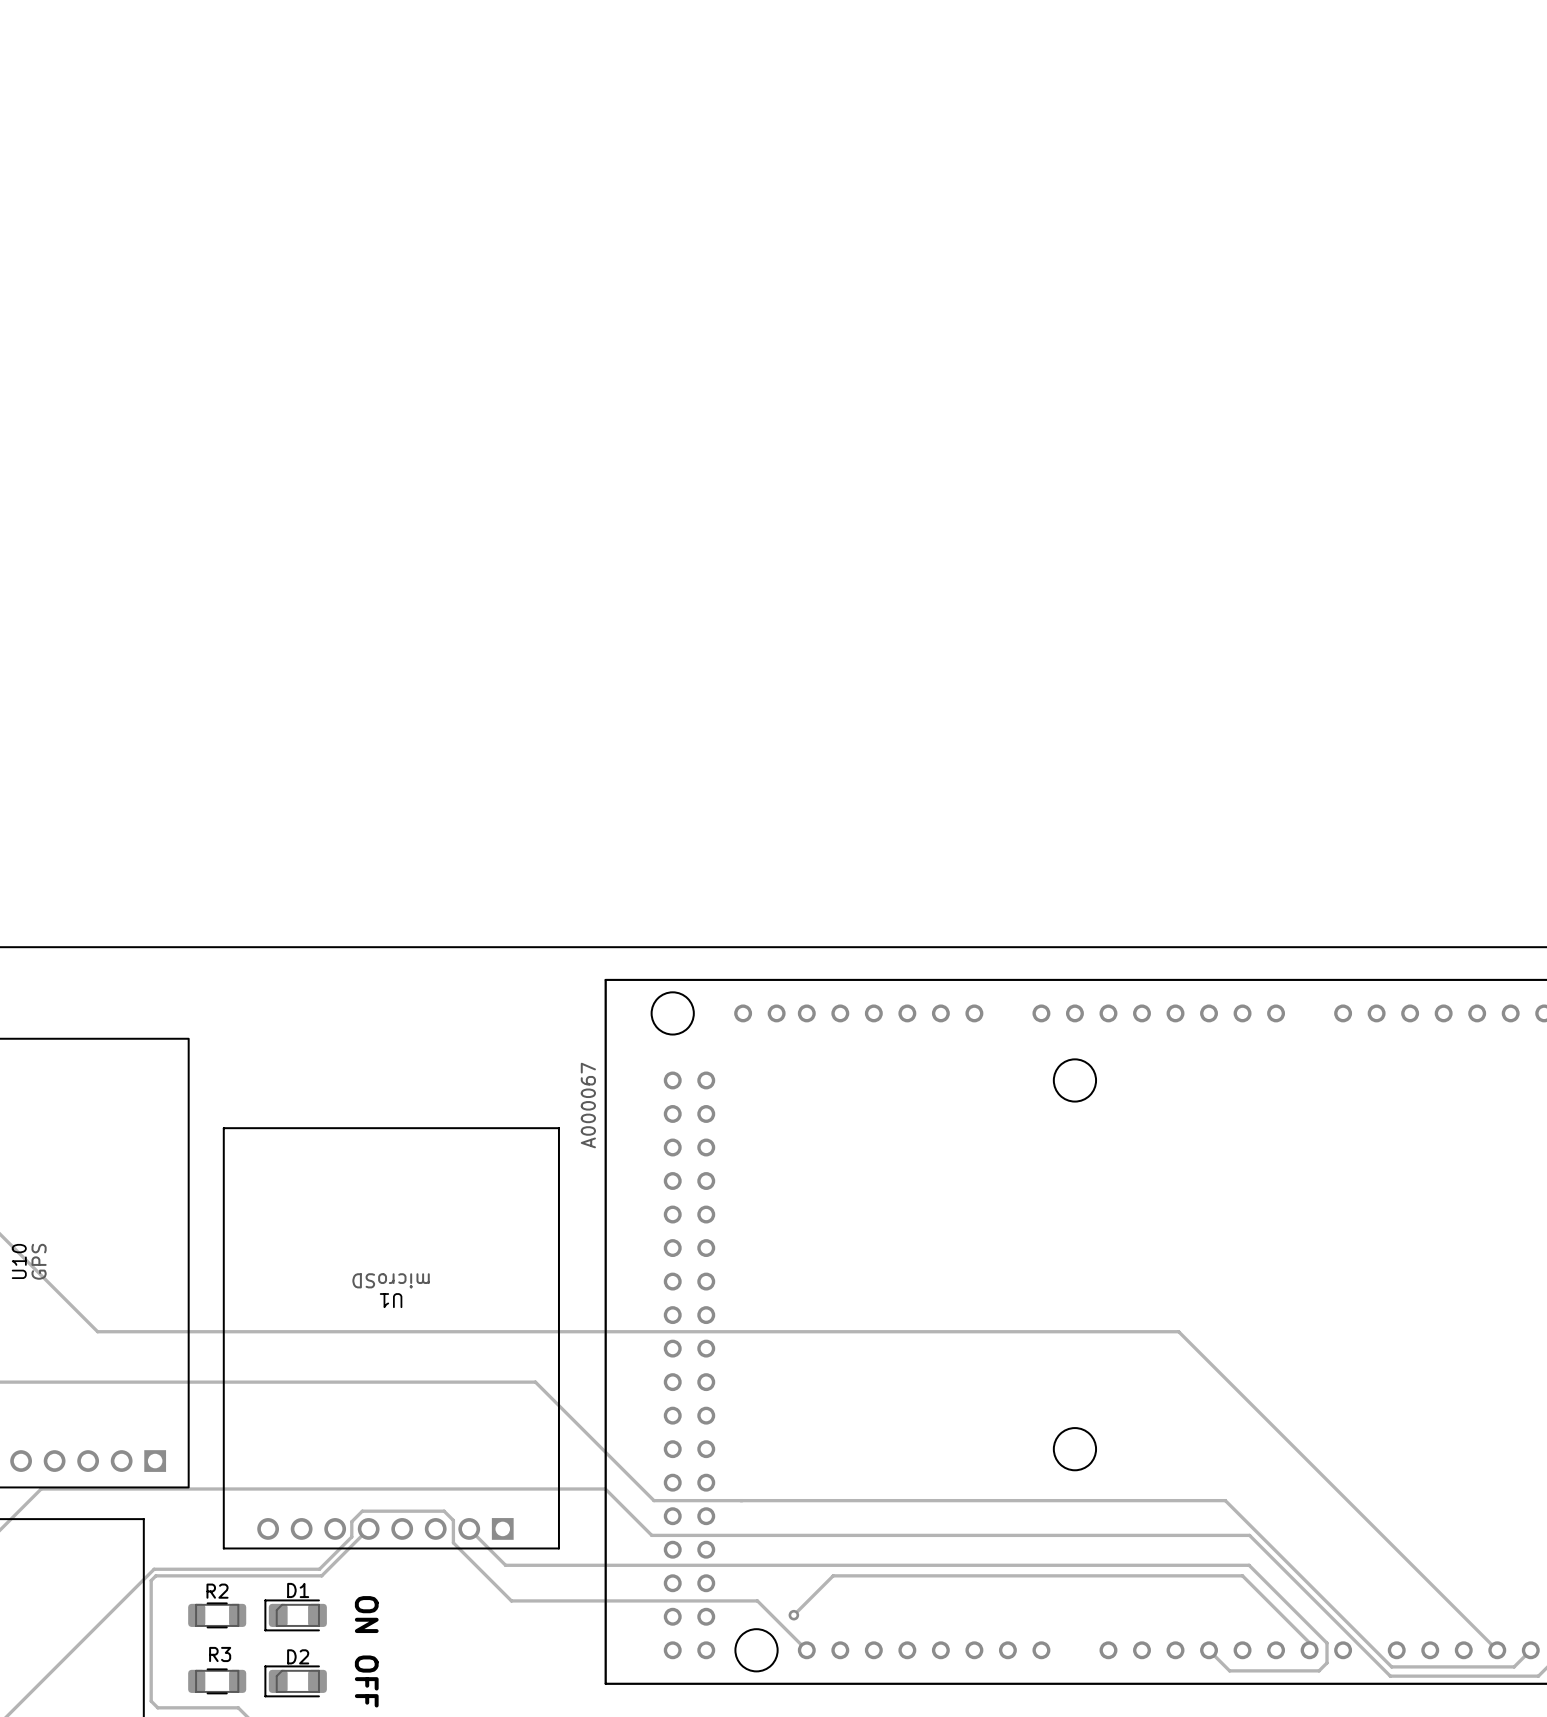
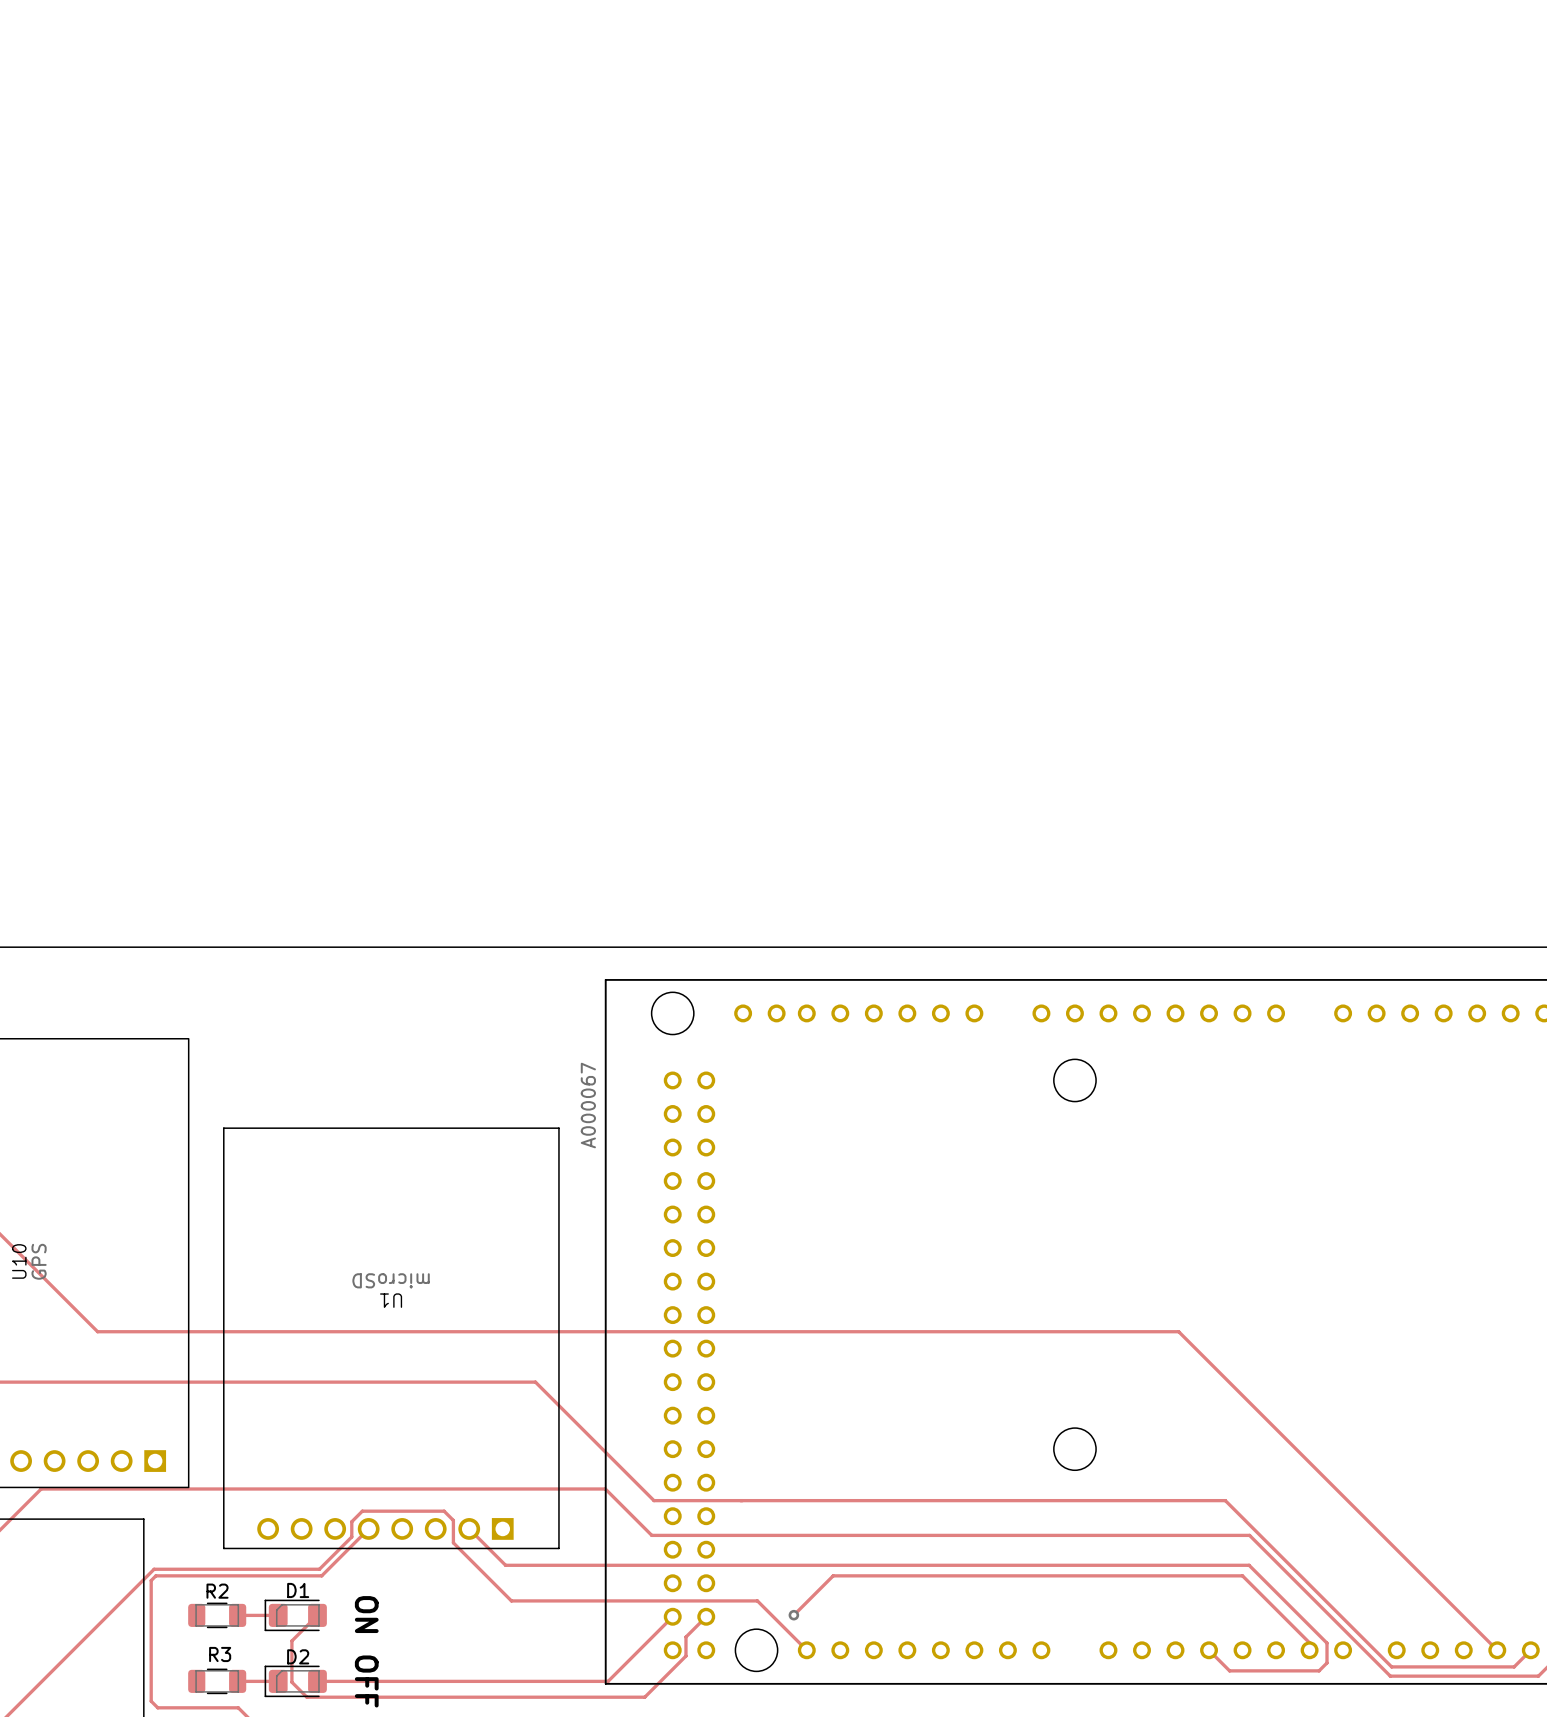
track: none -> (237, 1615) (278, 1615)
track: none -> (317, 1615) (291, 1640) (291, 1682) (306, 1697) (644, 1697) (685, 1656) (685, 1637) (706, 1616)
track: none -> (672, 1616) (608, 1681) (317, 1681)
track: none -> (237, 1681) (278, 1681)

